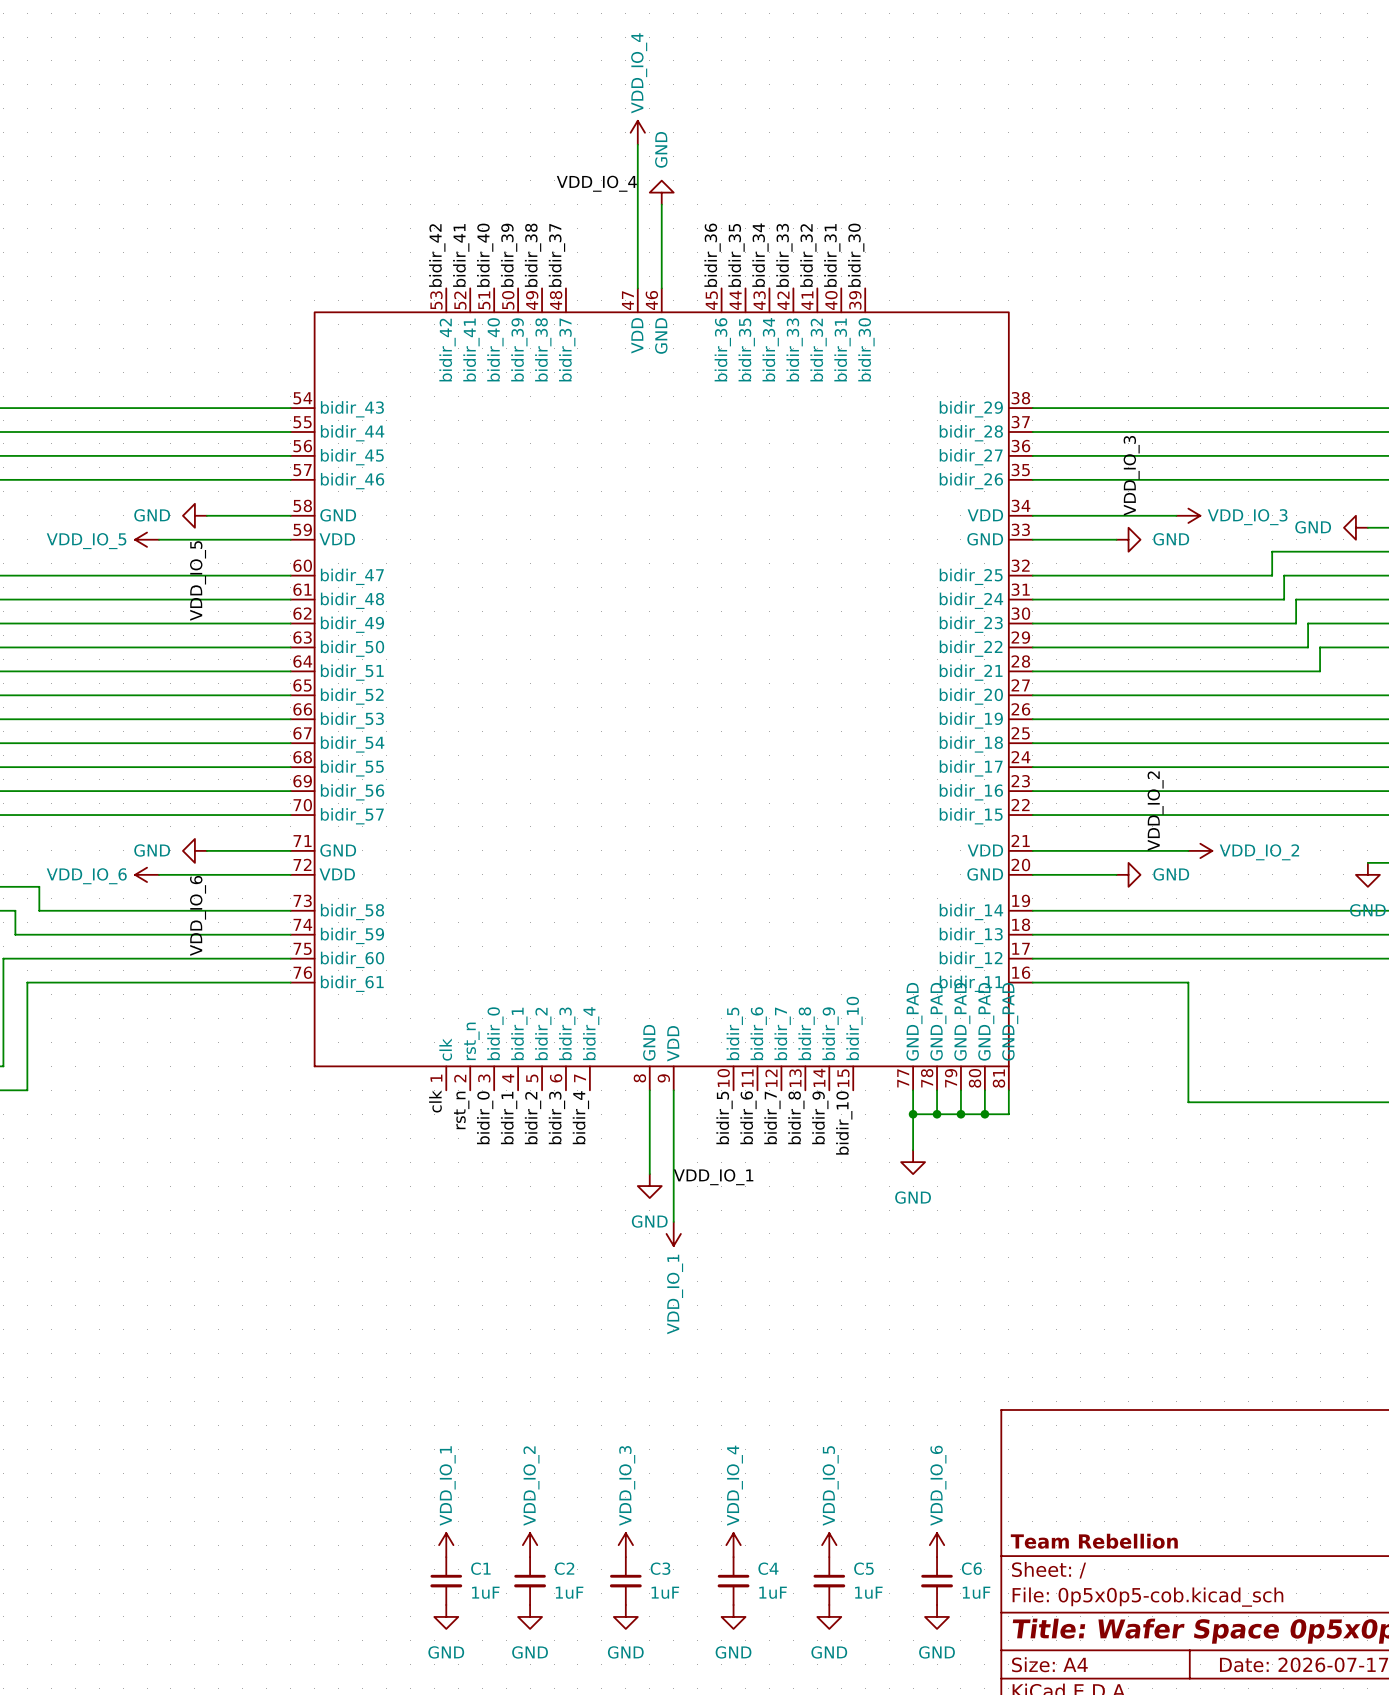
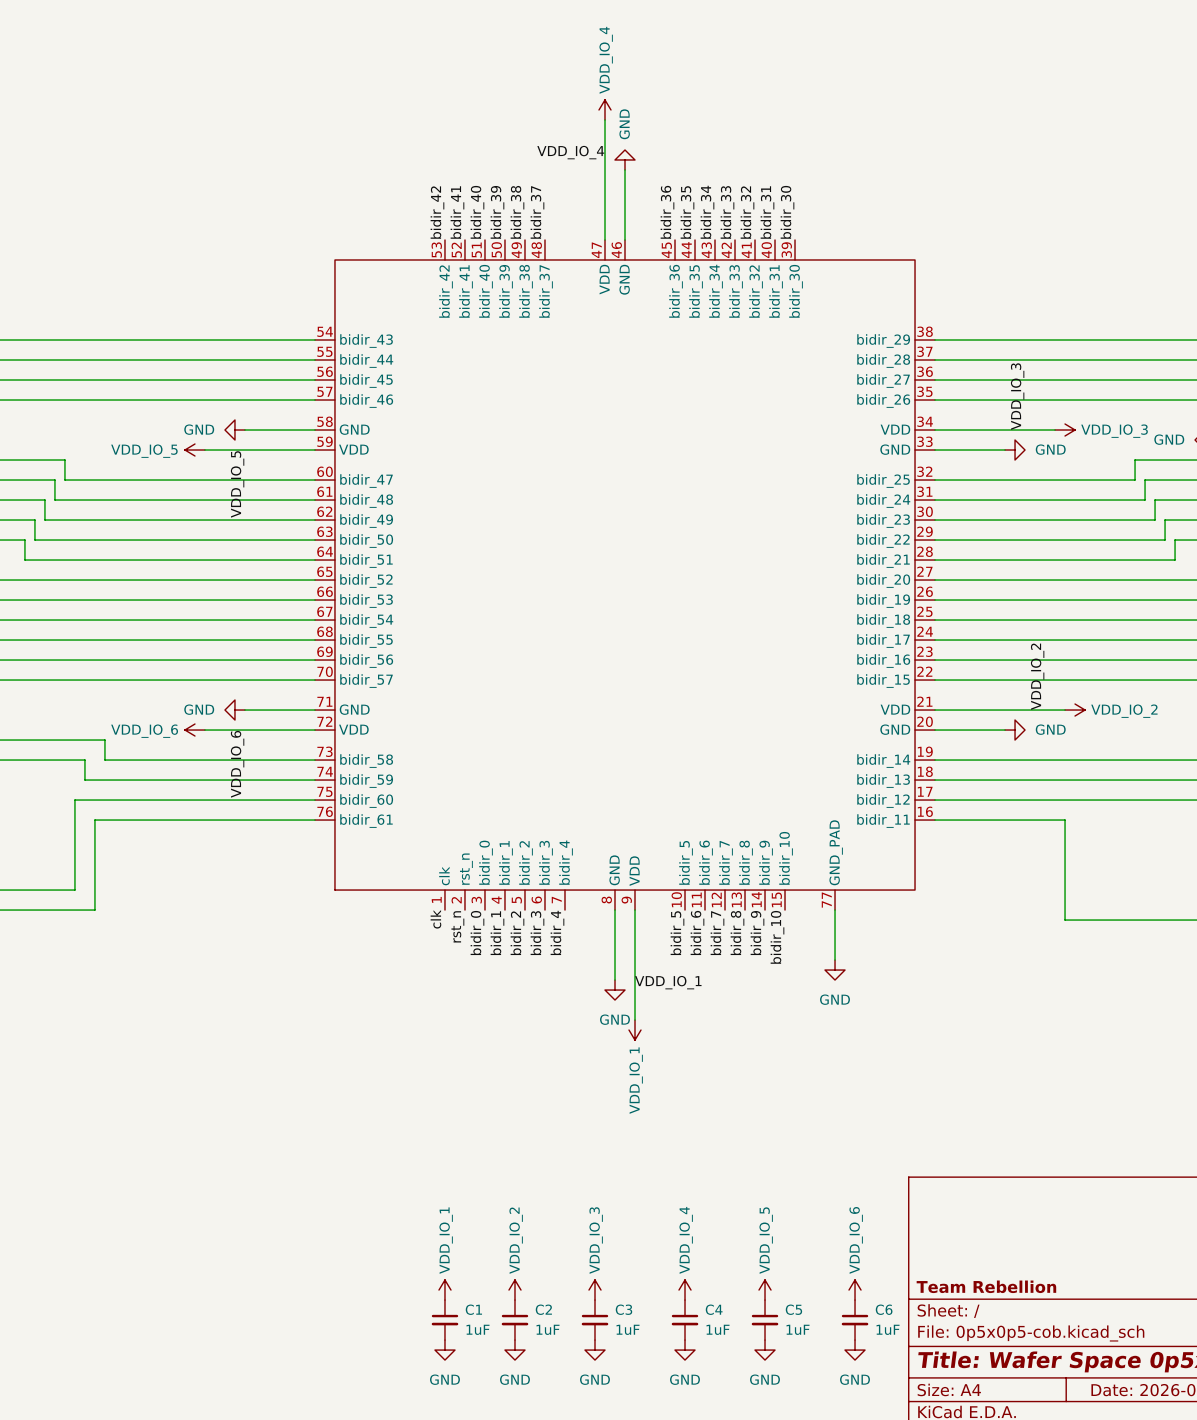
part symbol: [290, 288, 1033, 1091] -> [314, 239, 936, 911]
wire: (937, 1090) (937, 1114) -> none
wire: (960, 1090) (960, 1114) -> none
wire: (984, 1090) (984, 1114) -> none
wire: (1008, 1090) (1008, 1114) (913, 1114) -> none
junction: (913, 1114) -> none
junction: (937, 1114) -> none
junction: (960, 1114) -> none
junction: (984, 1114) -> none

